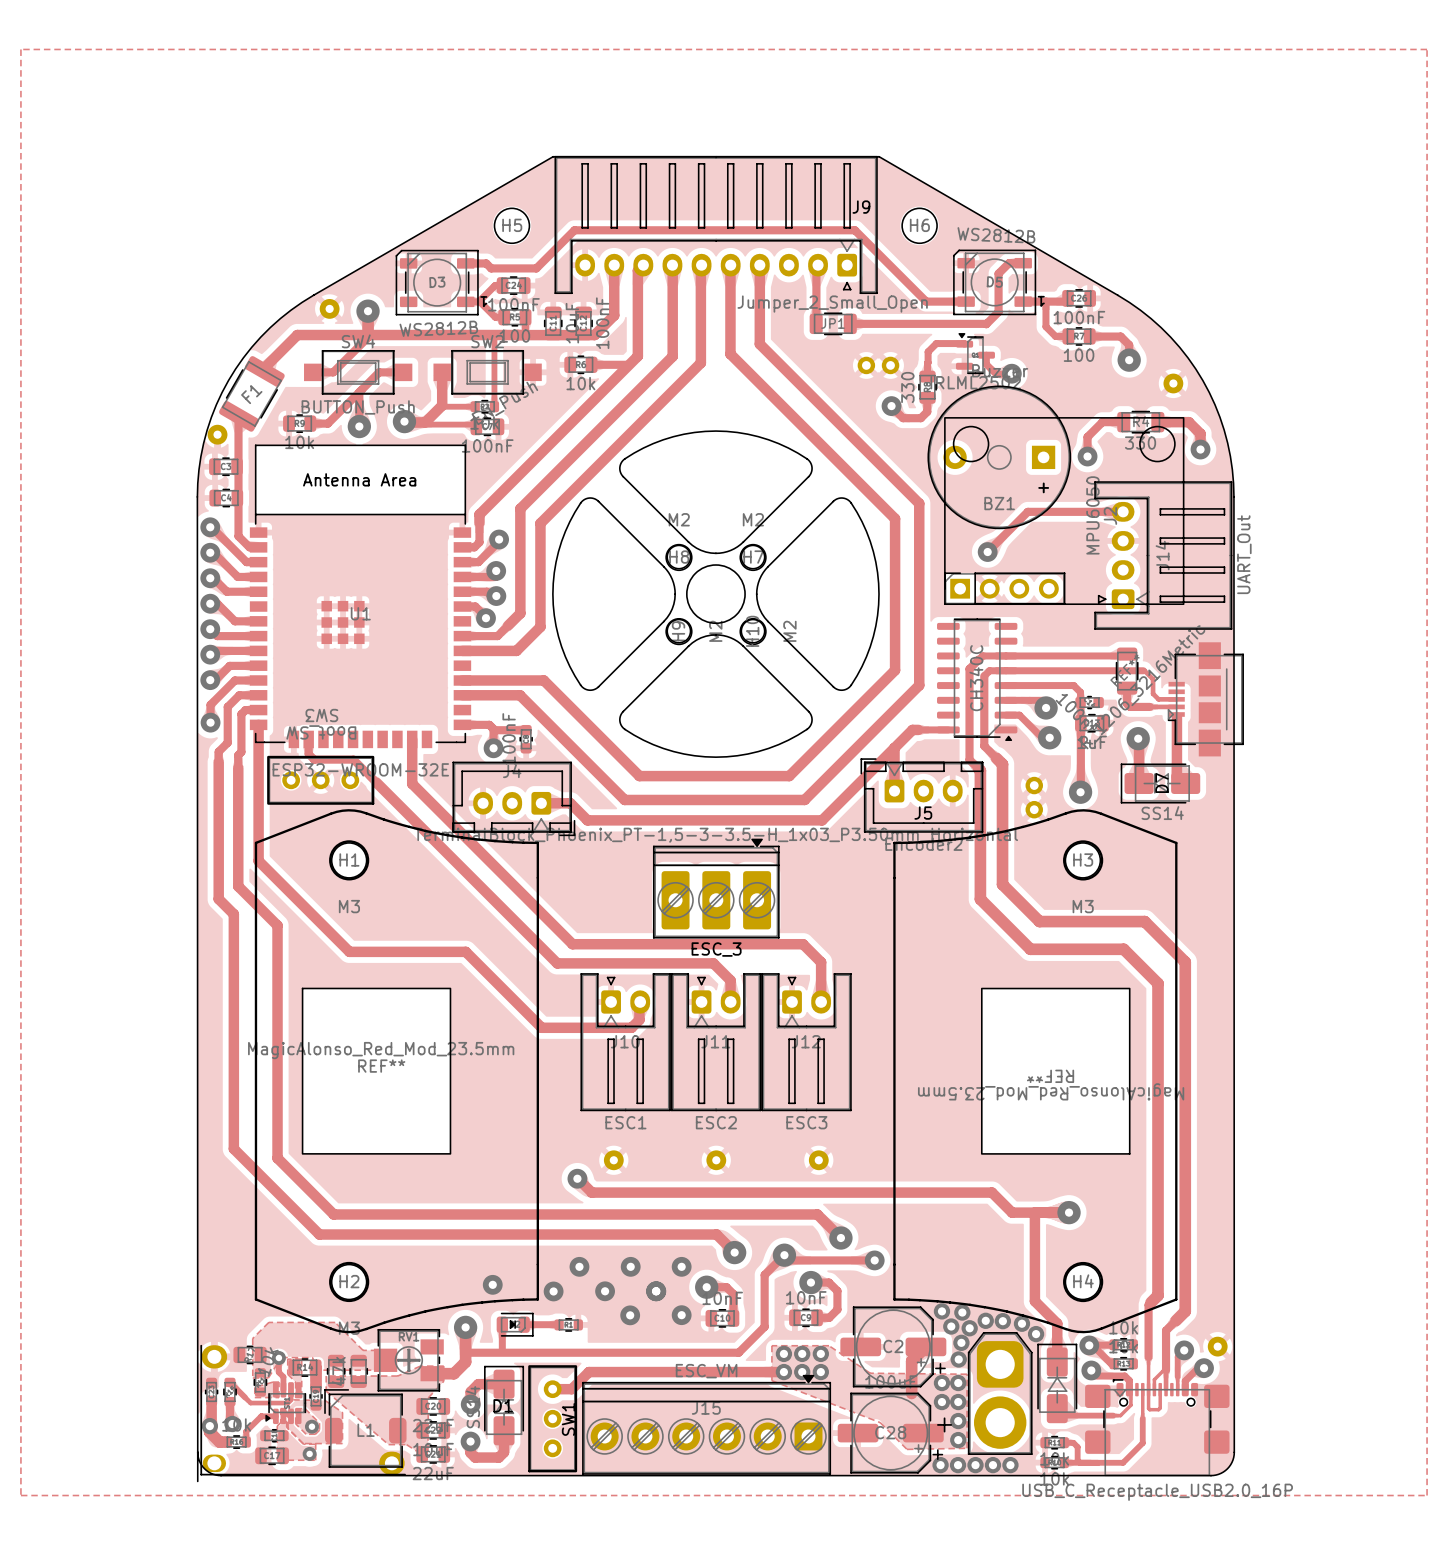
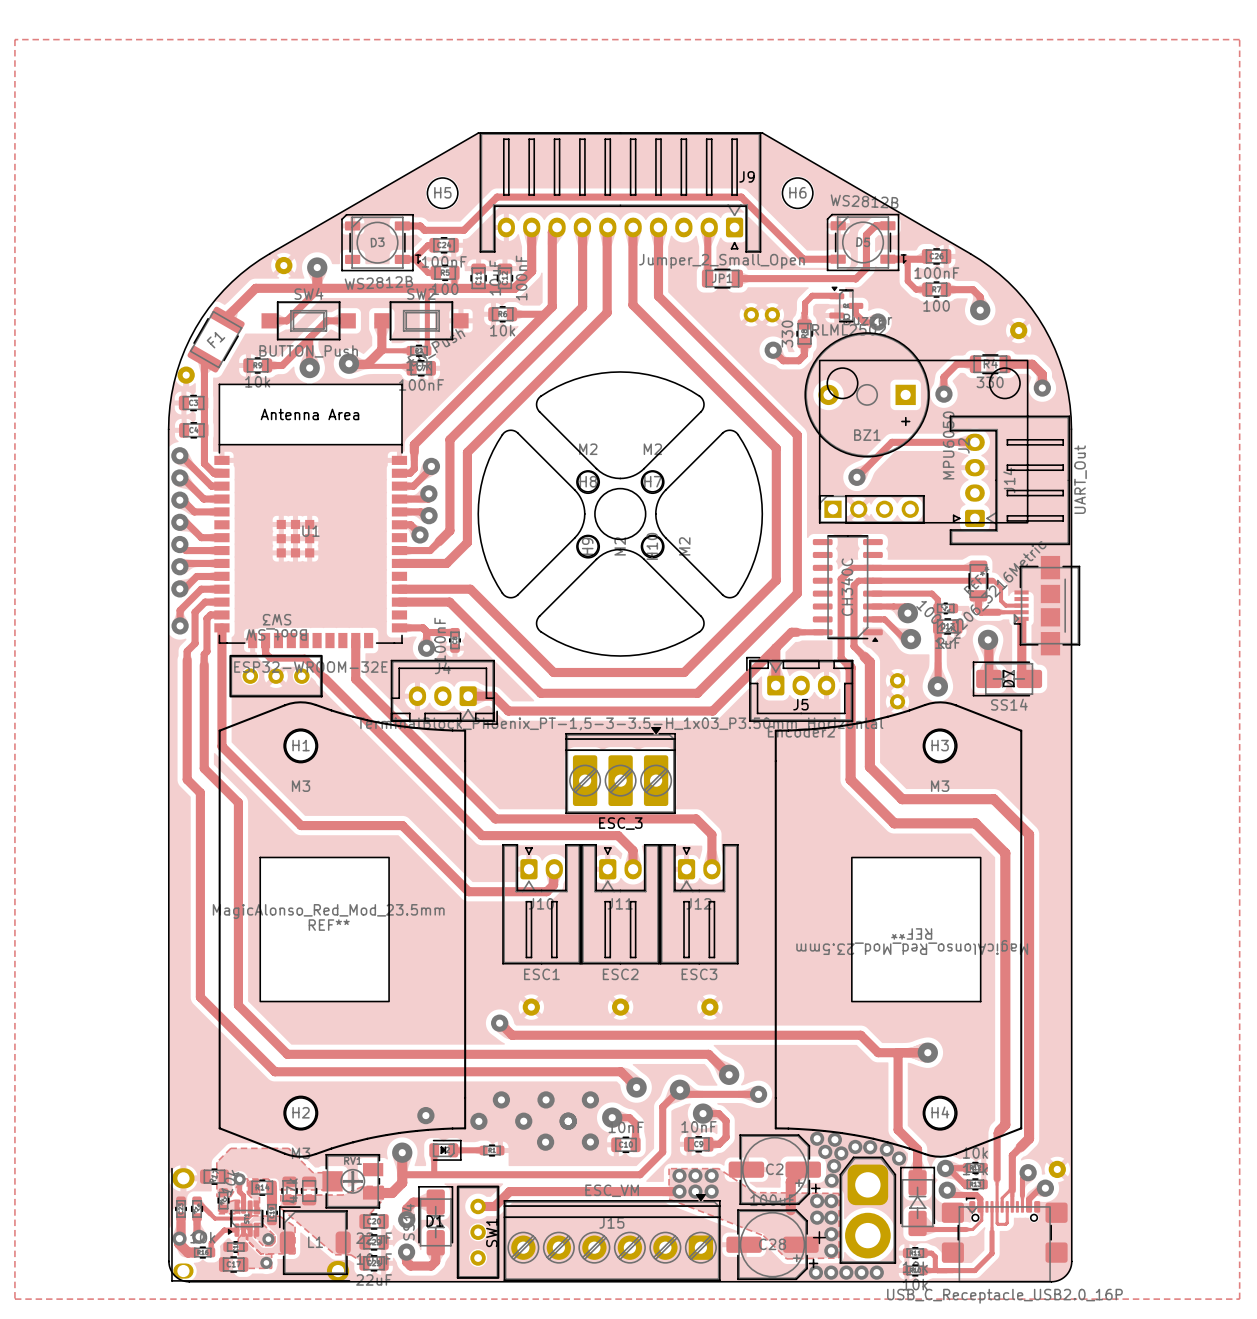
board edge: (197, 1452) (197, 1481) -> none

